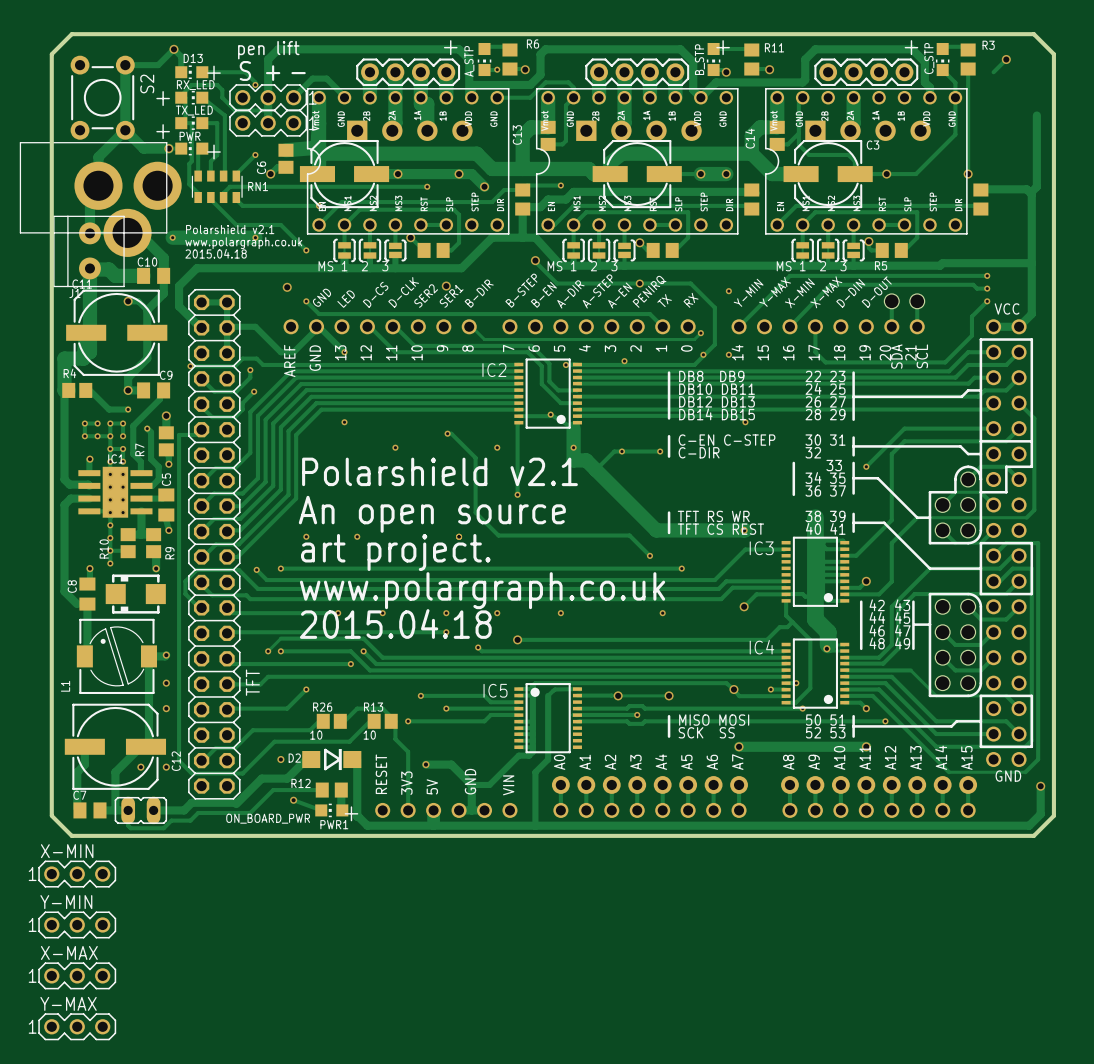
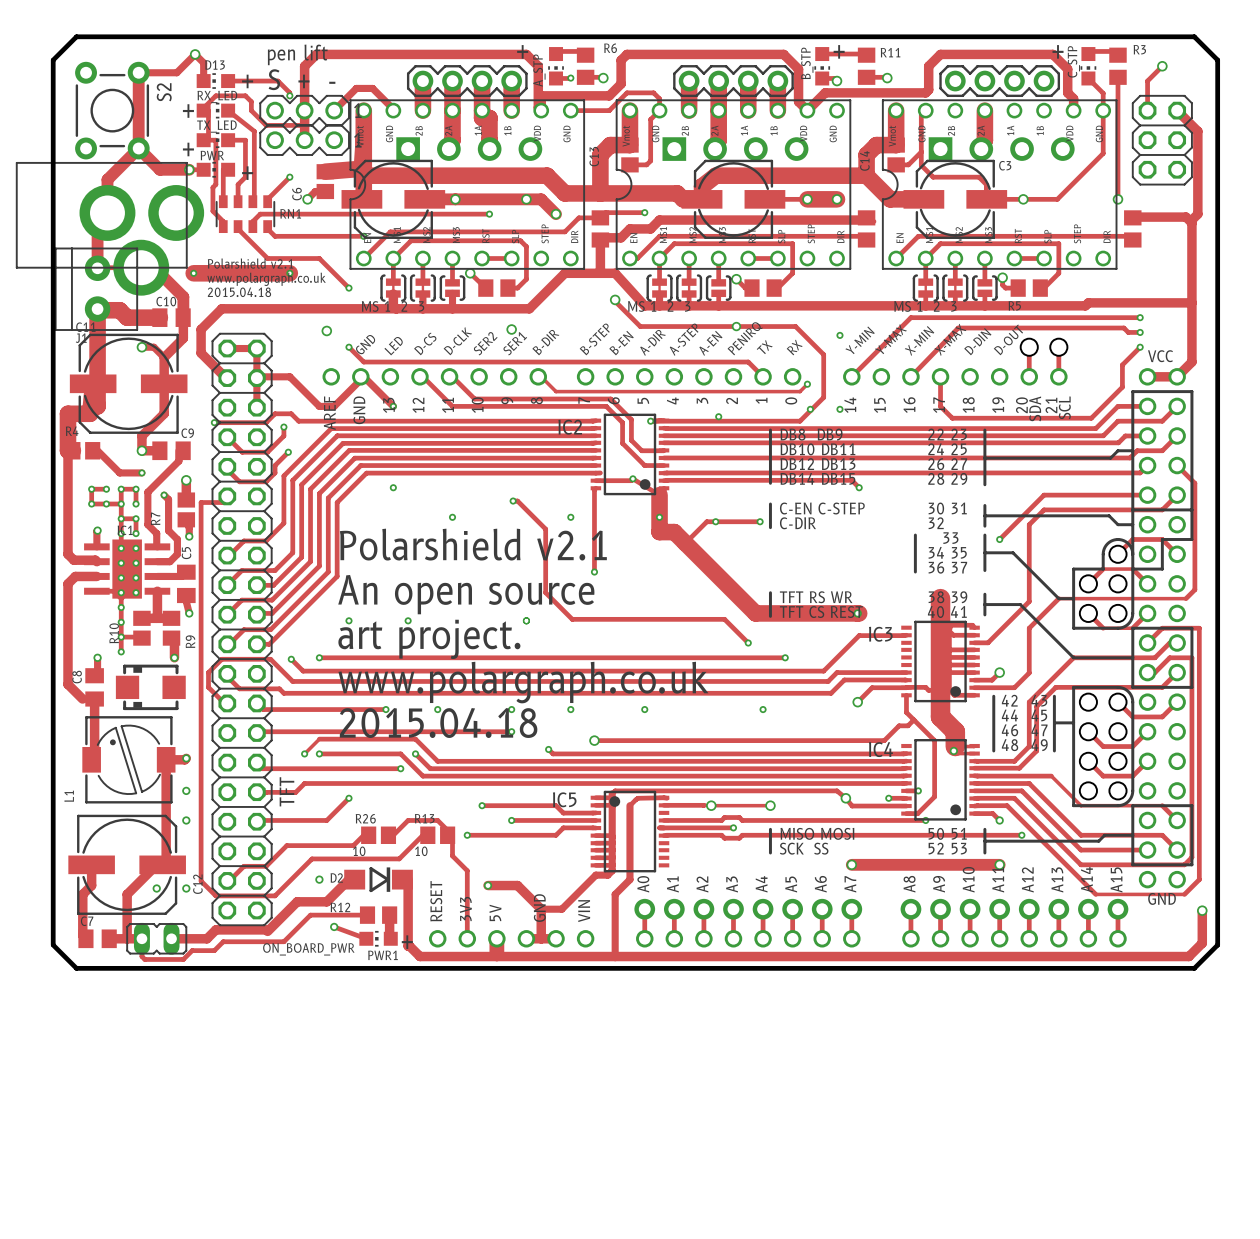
track: none -> (1147, 81) (1147, 110)
track: none -> (1177, 110) (1197, 131)
part: none -> (1162, 140)
X-MIN: (77, 874) -> none
Y-MIN: (77, 924) -> none
X-MAX: (77, 975) -> none
Y-MAX: (77, 1026) -> none

